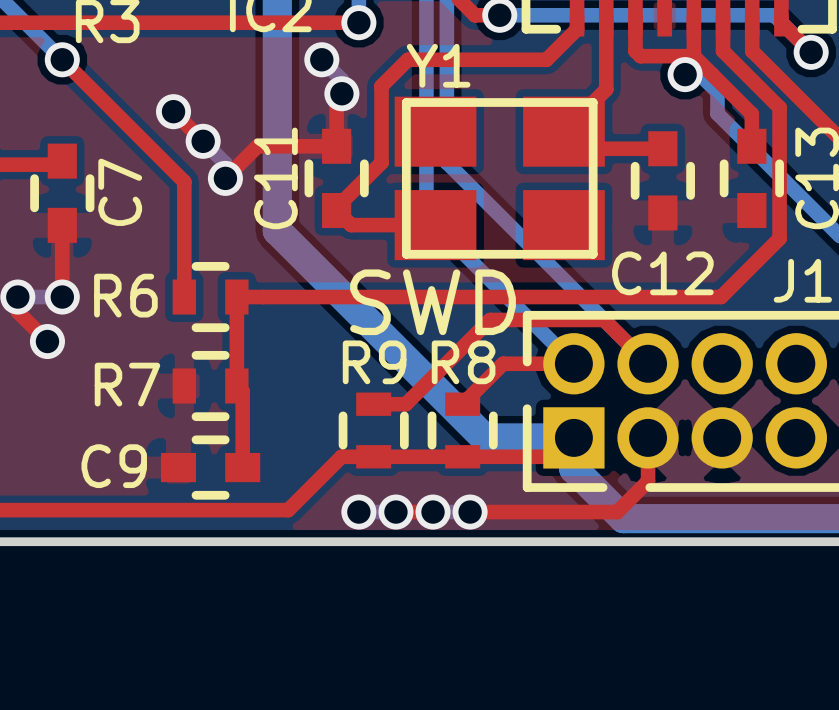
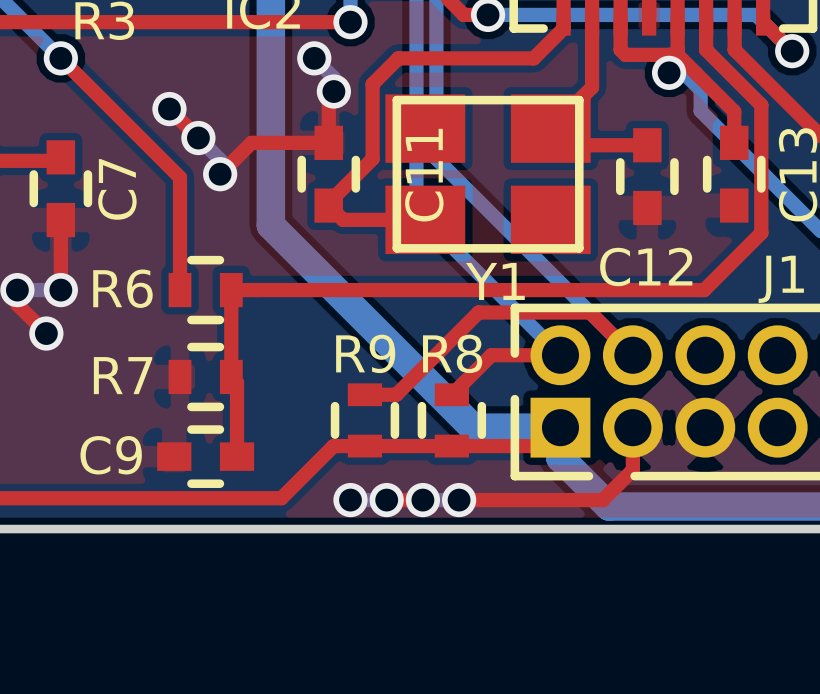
Y1 name position: Y1 (438, 65) -> Y1 (495, 281)
C11 name position: C11 (275, 178) -> C11 (424, 175)
text: SWD (433, 302) -> none

